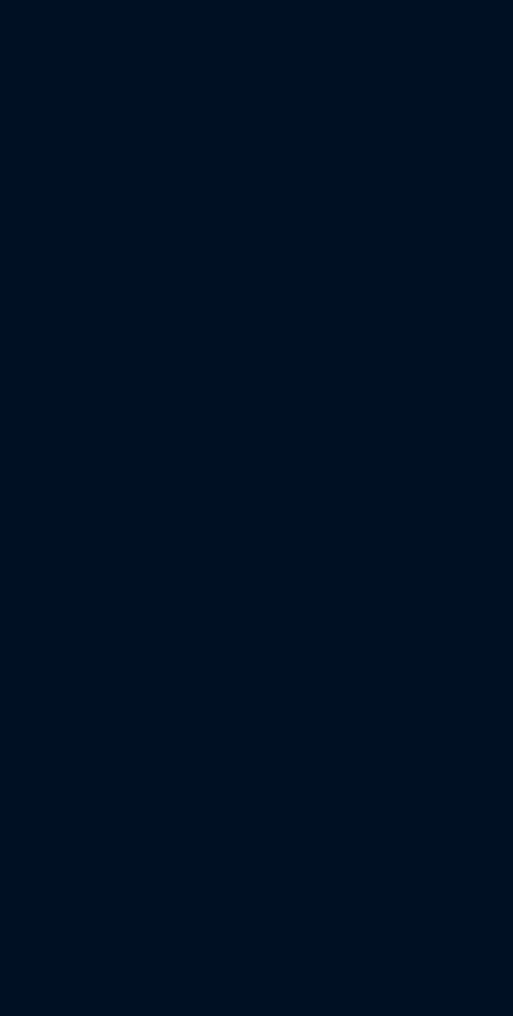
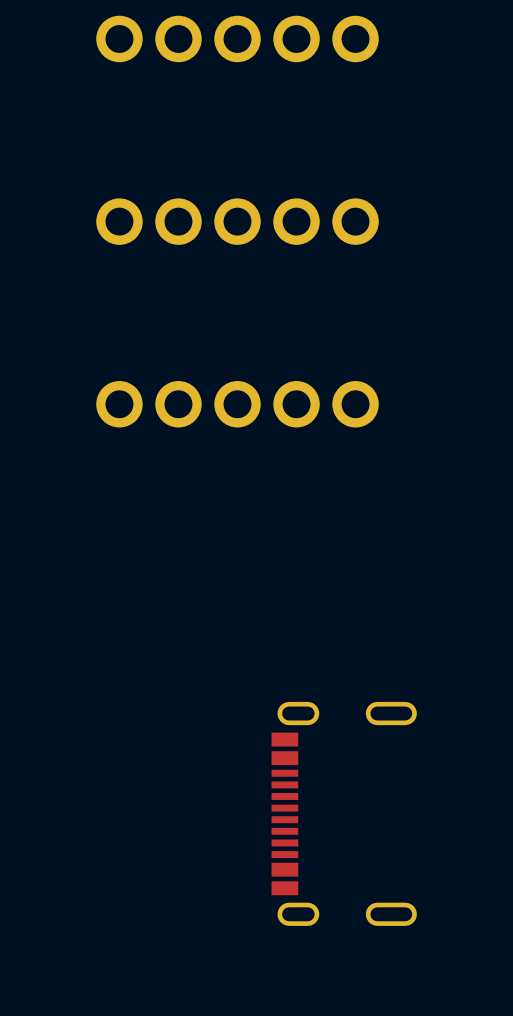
part: none -> (237, 38)
part: none -> (237, 221)
part: none -> (237, 404)
part: none -> (344, 813)

